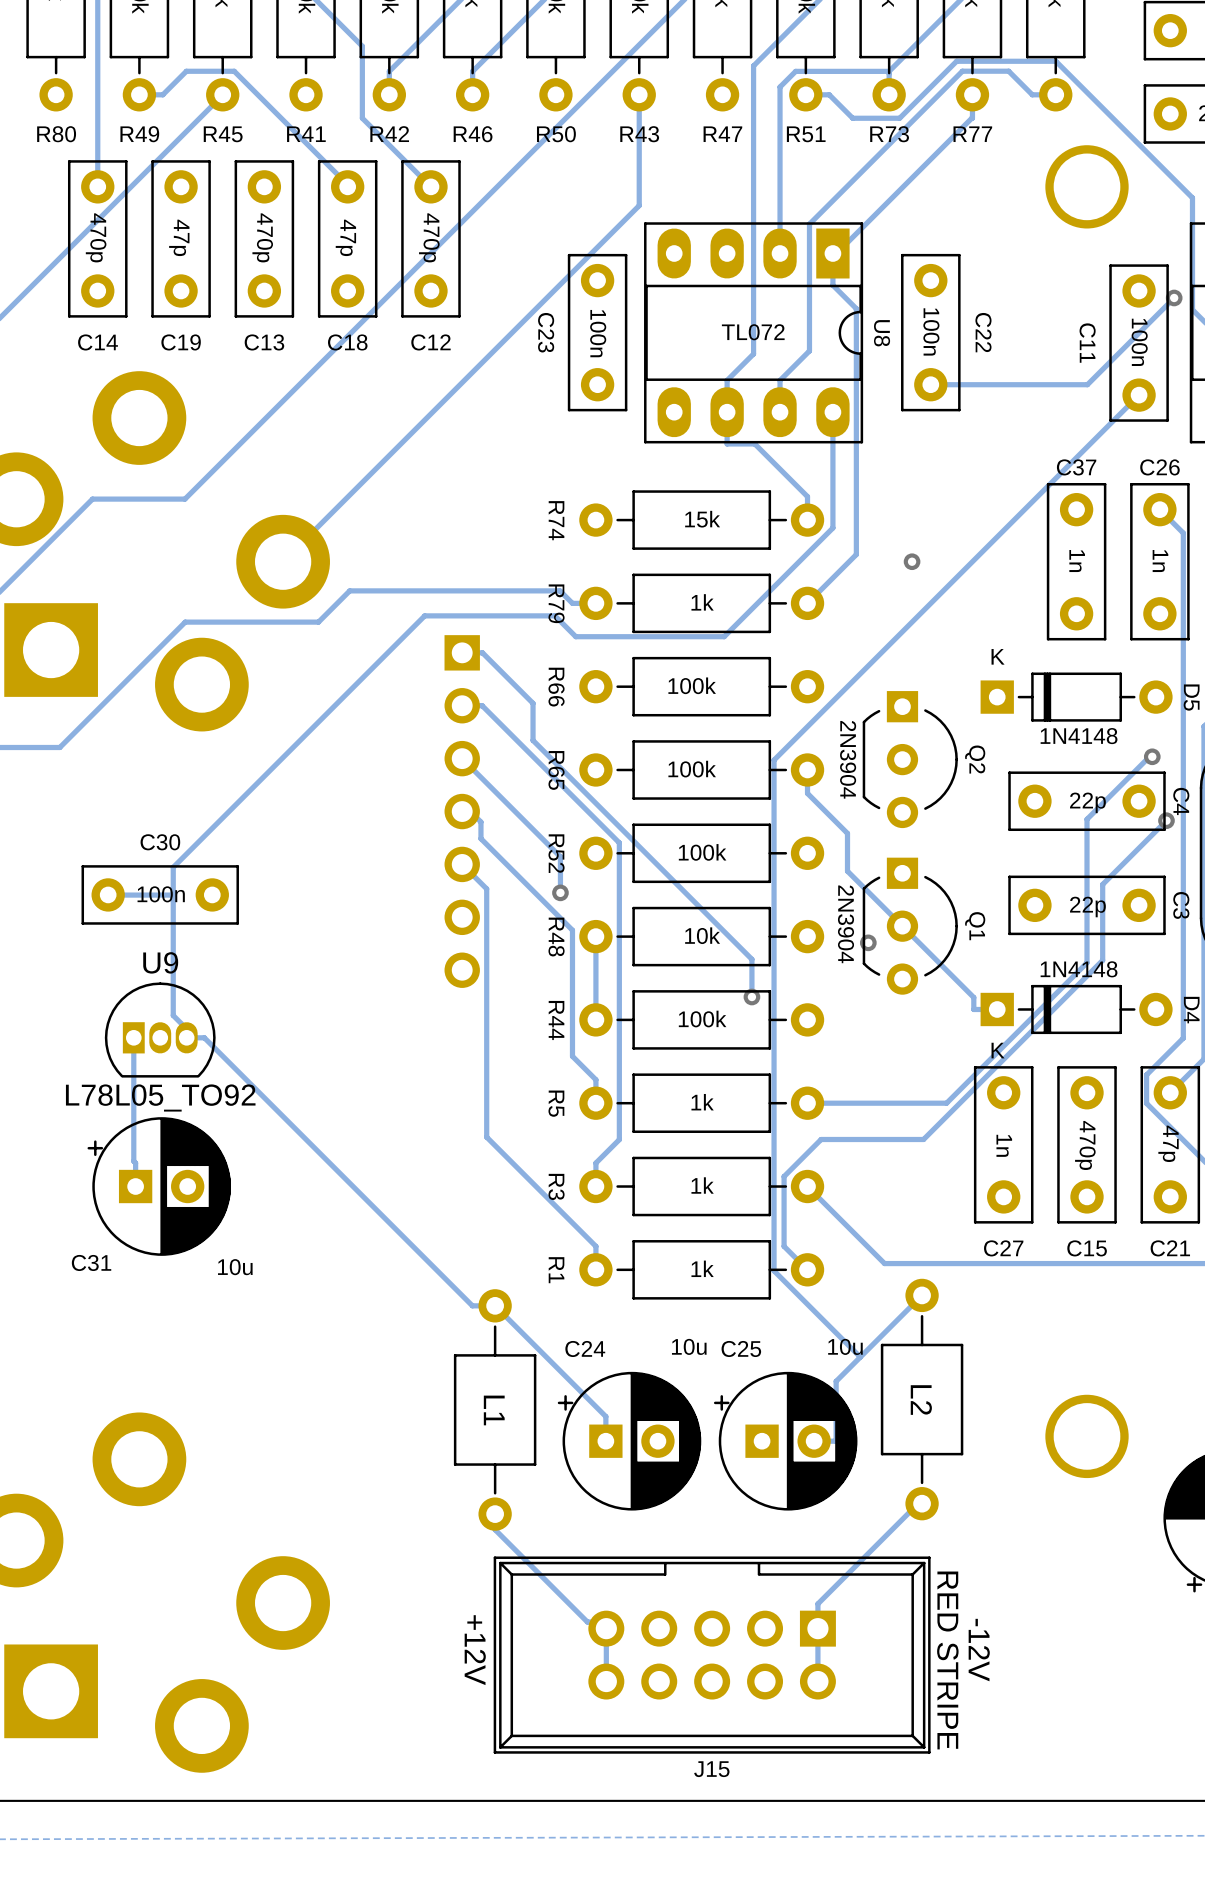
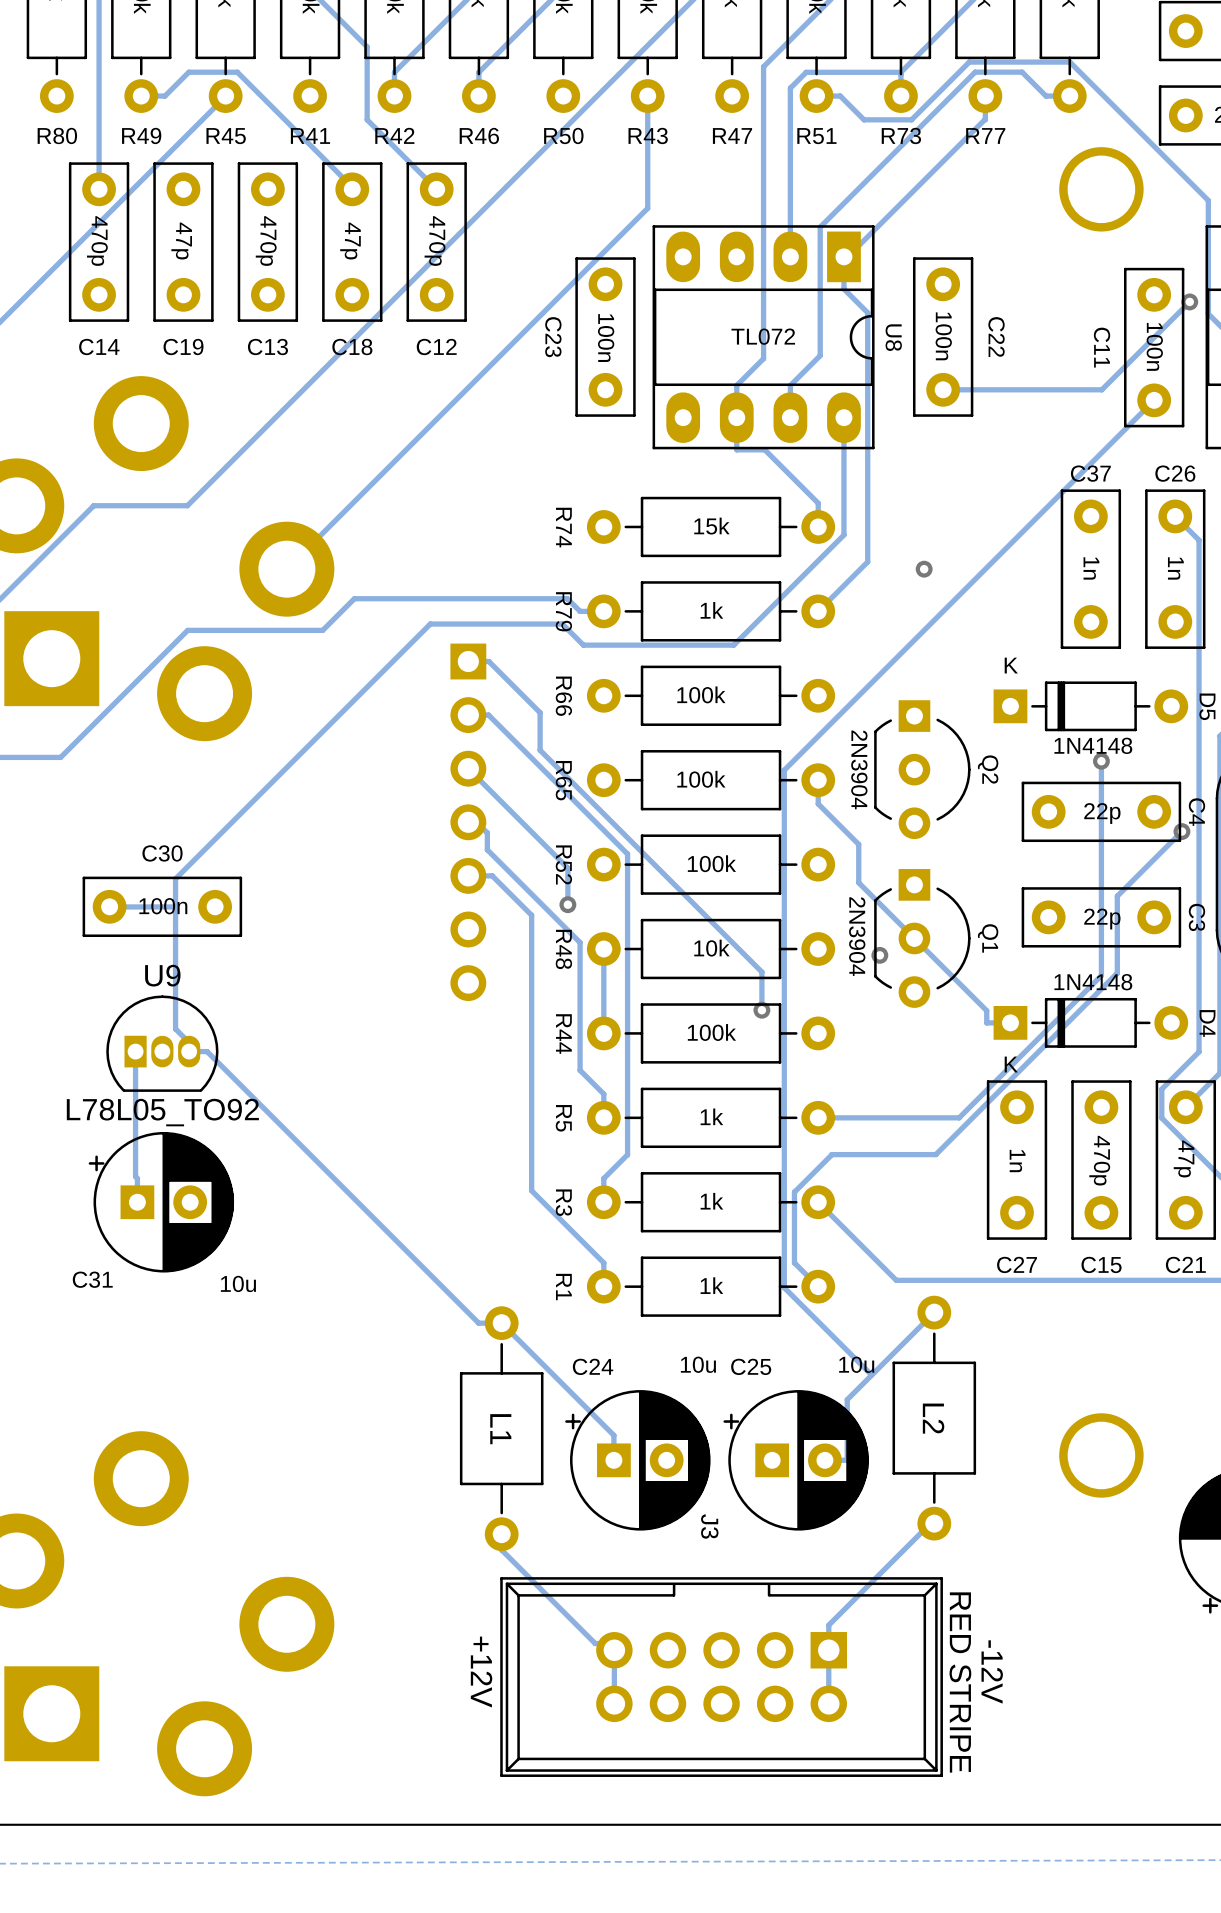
track: (1152, 756) (1149, 756) (1087, 819) -> (1101, 761) (1101, 830)
via position: (1152, 756) -> (1101, 761)
track: (462, 864) (486, 888) (486, 1137) (524, 1175) -> (468, 875) (492, 875) (531, 915) (531, 1190)
J15 name: J15 (711, 1769) -> J3 (709, 1526)

